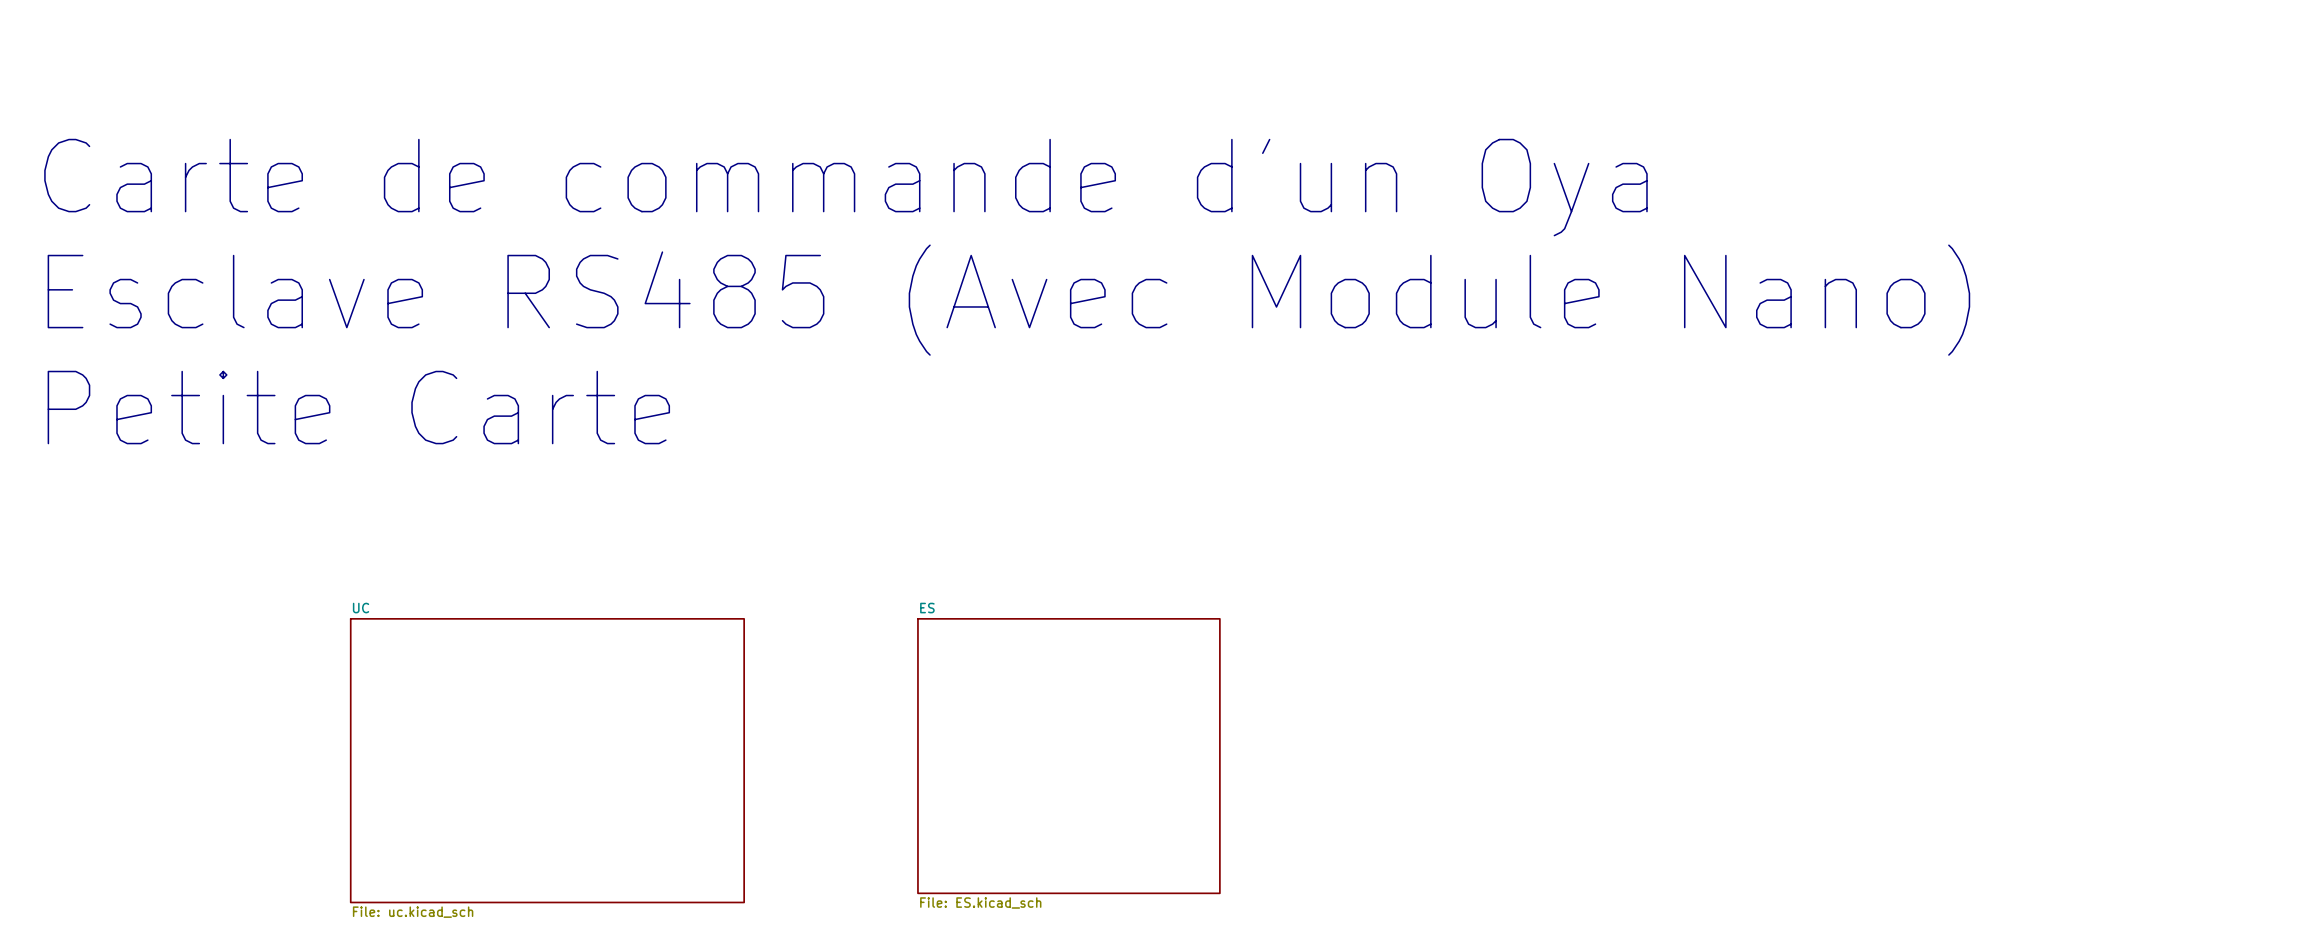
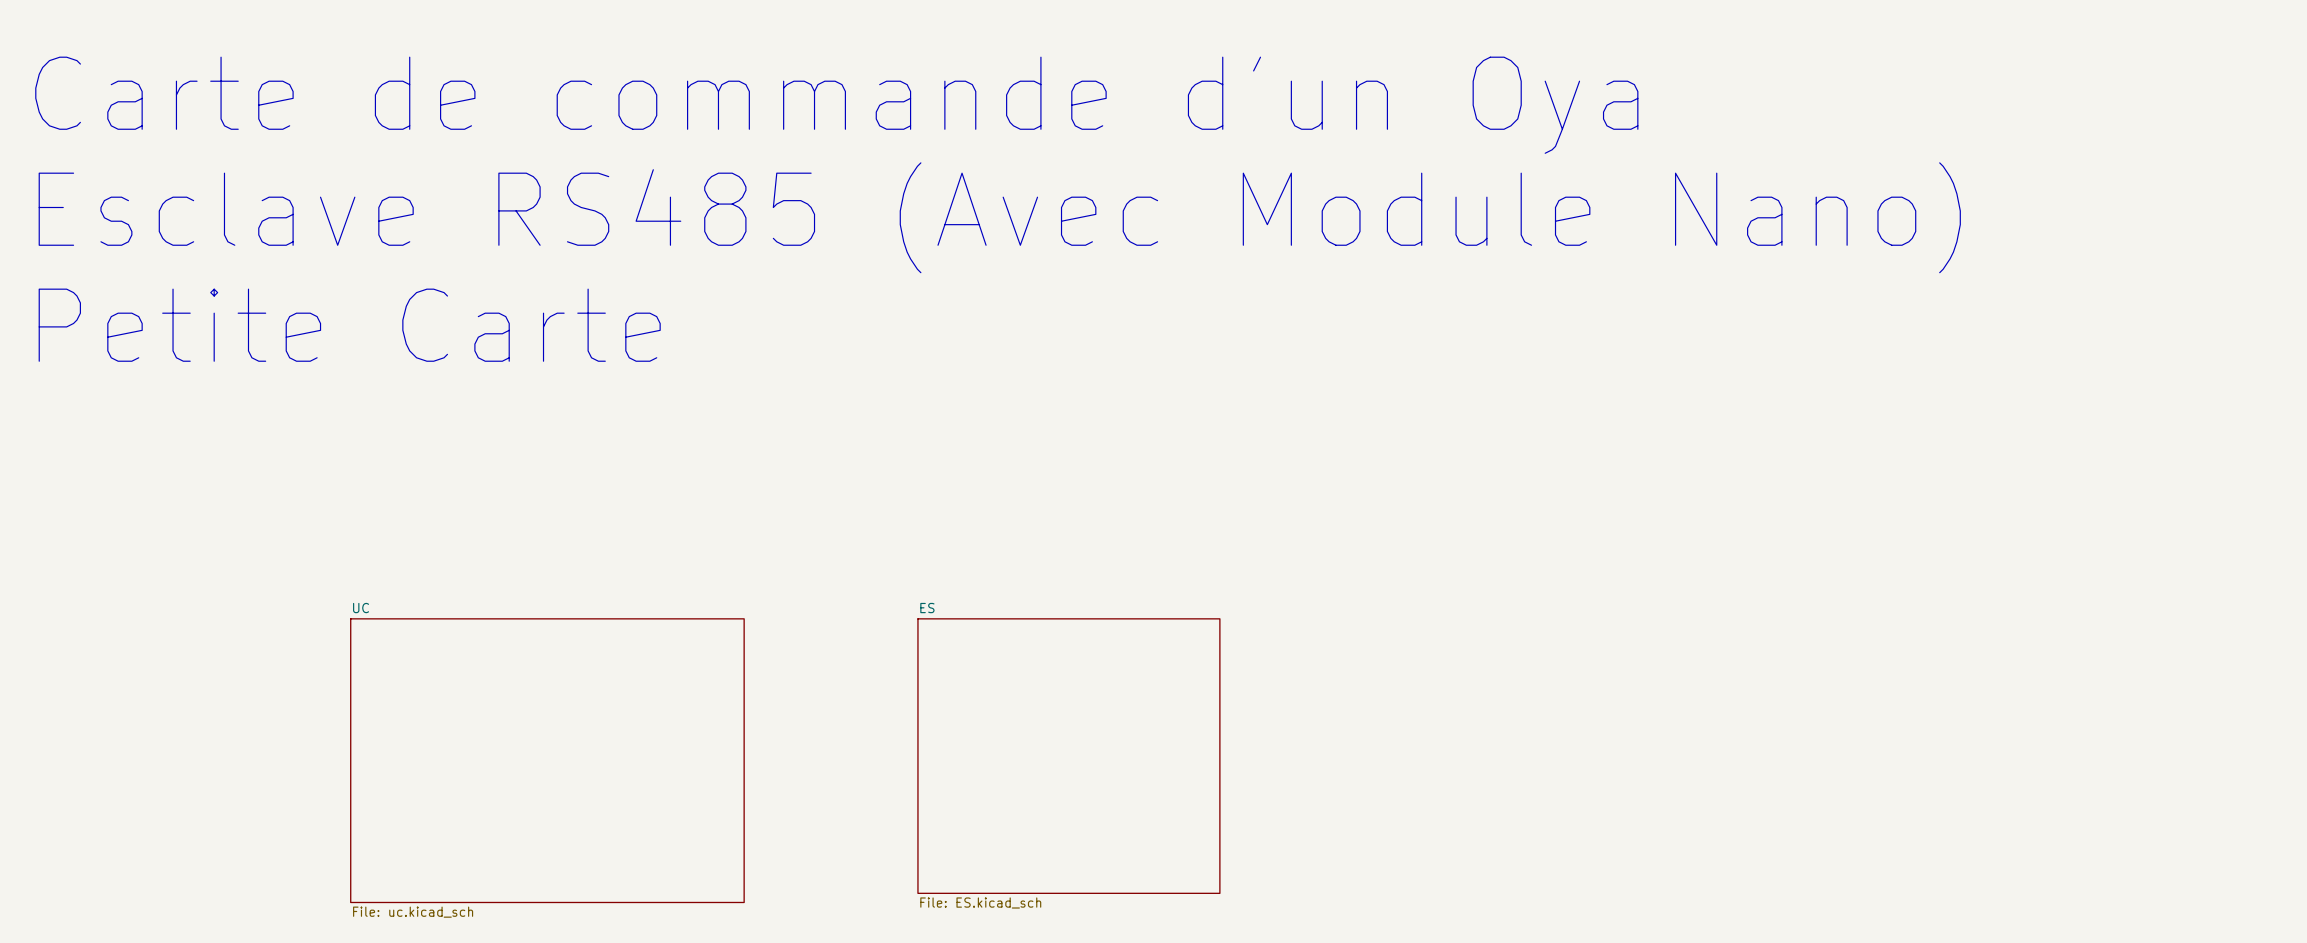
text position: Carte de commande d'un Oya (845, 187) -> Carte de commande d'un Oya (836, 105)
text position: Esclave RS485 (Avec Module Nano) (1008, 300) -> Esclave RS485 (Avec Module Nano) (999, 217)
text position: Petite Carte (358, 407) -> Petite Carte (349, 325)

